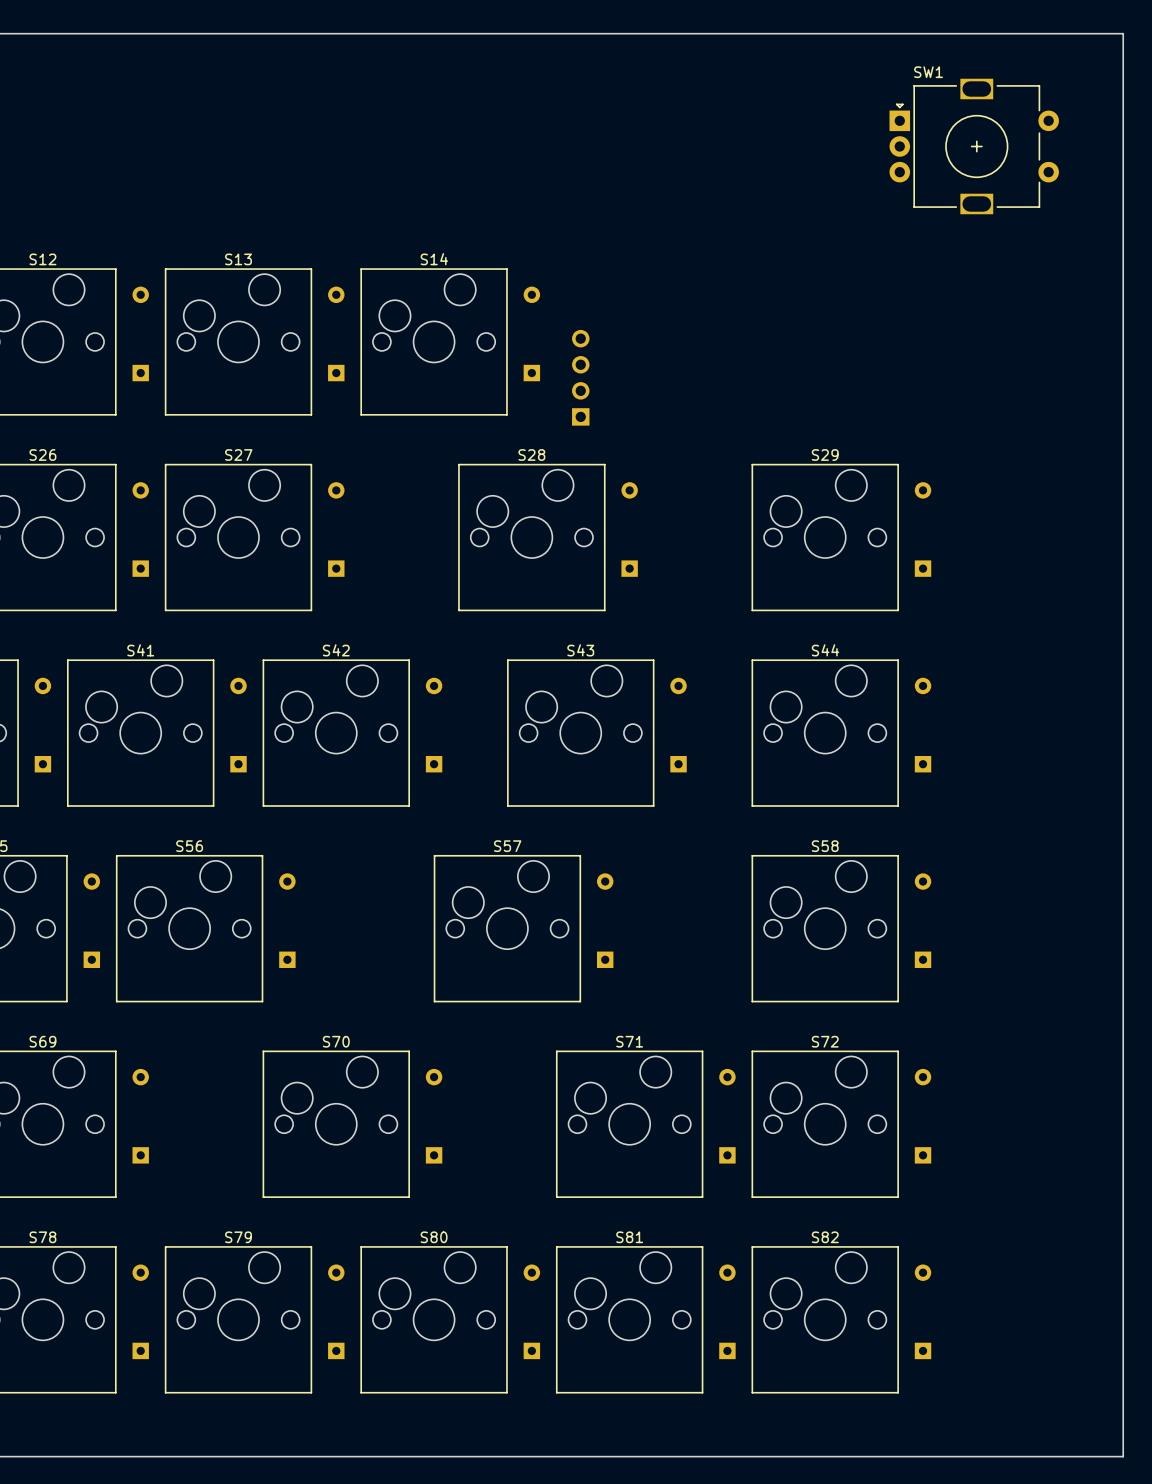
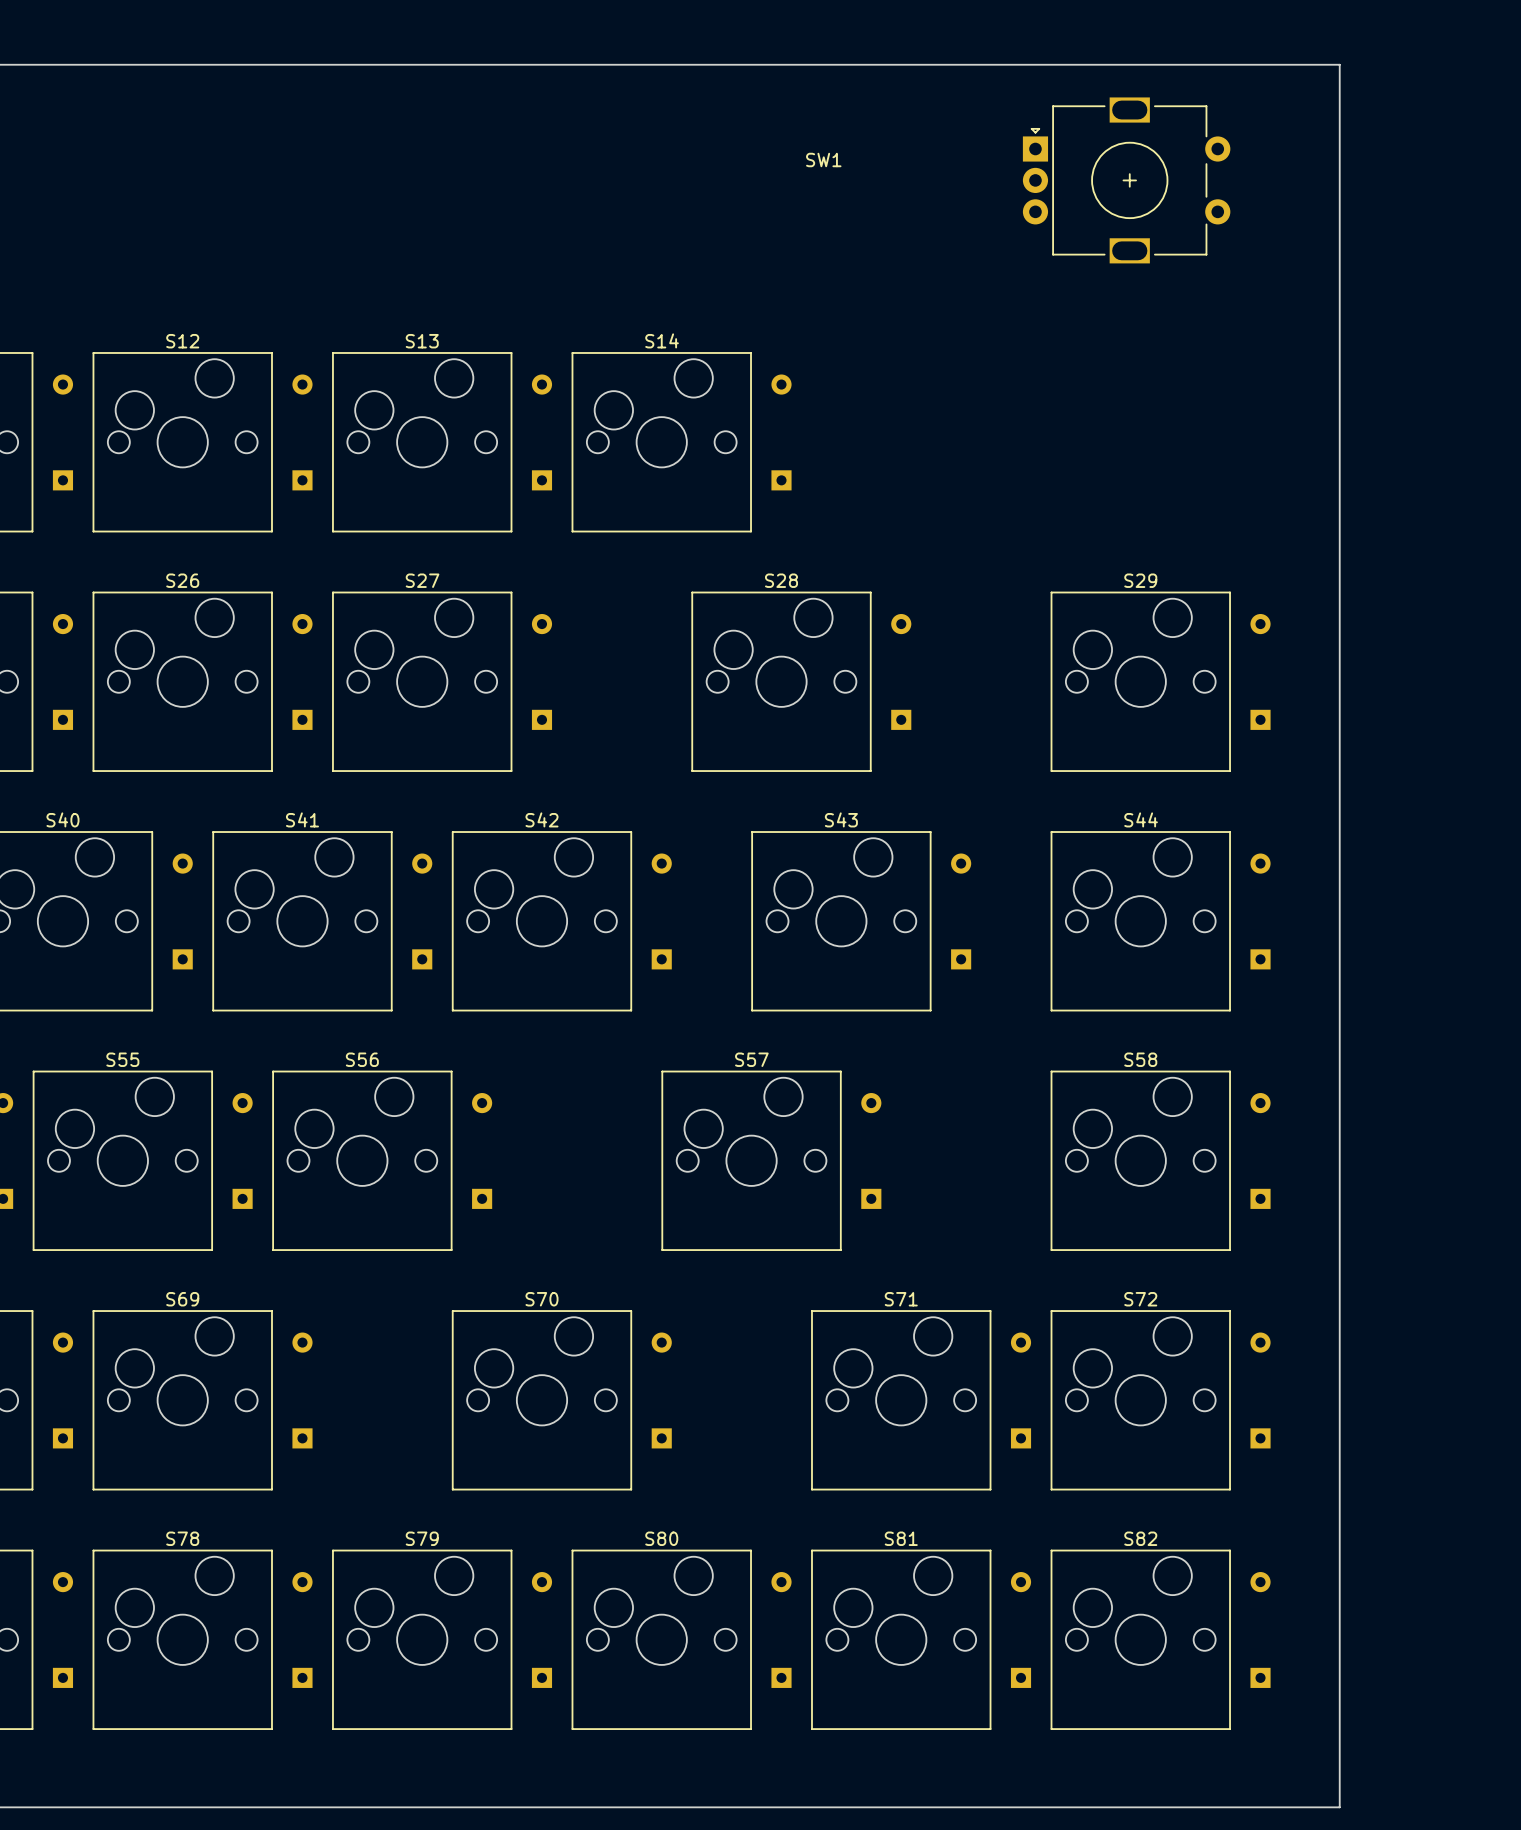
board edge: (987, 33) (1123, 33) (1123, 1456) (987, 1456) -> (1339, 64) (1339, 1807)
SW1 name position: SW1 (928, 72) -> SW1 (823, 160)
SW1 position: (974, 146) -> (1126, 180)
part: (580, 377) -> none

